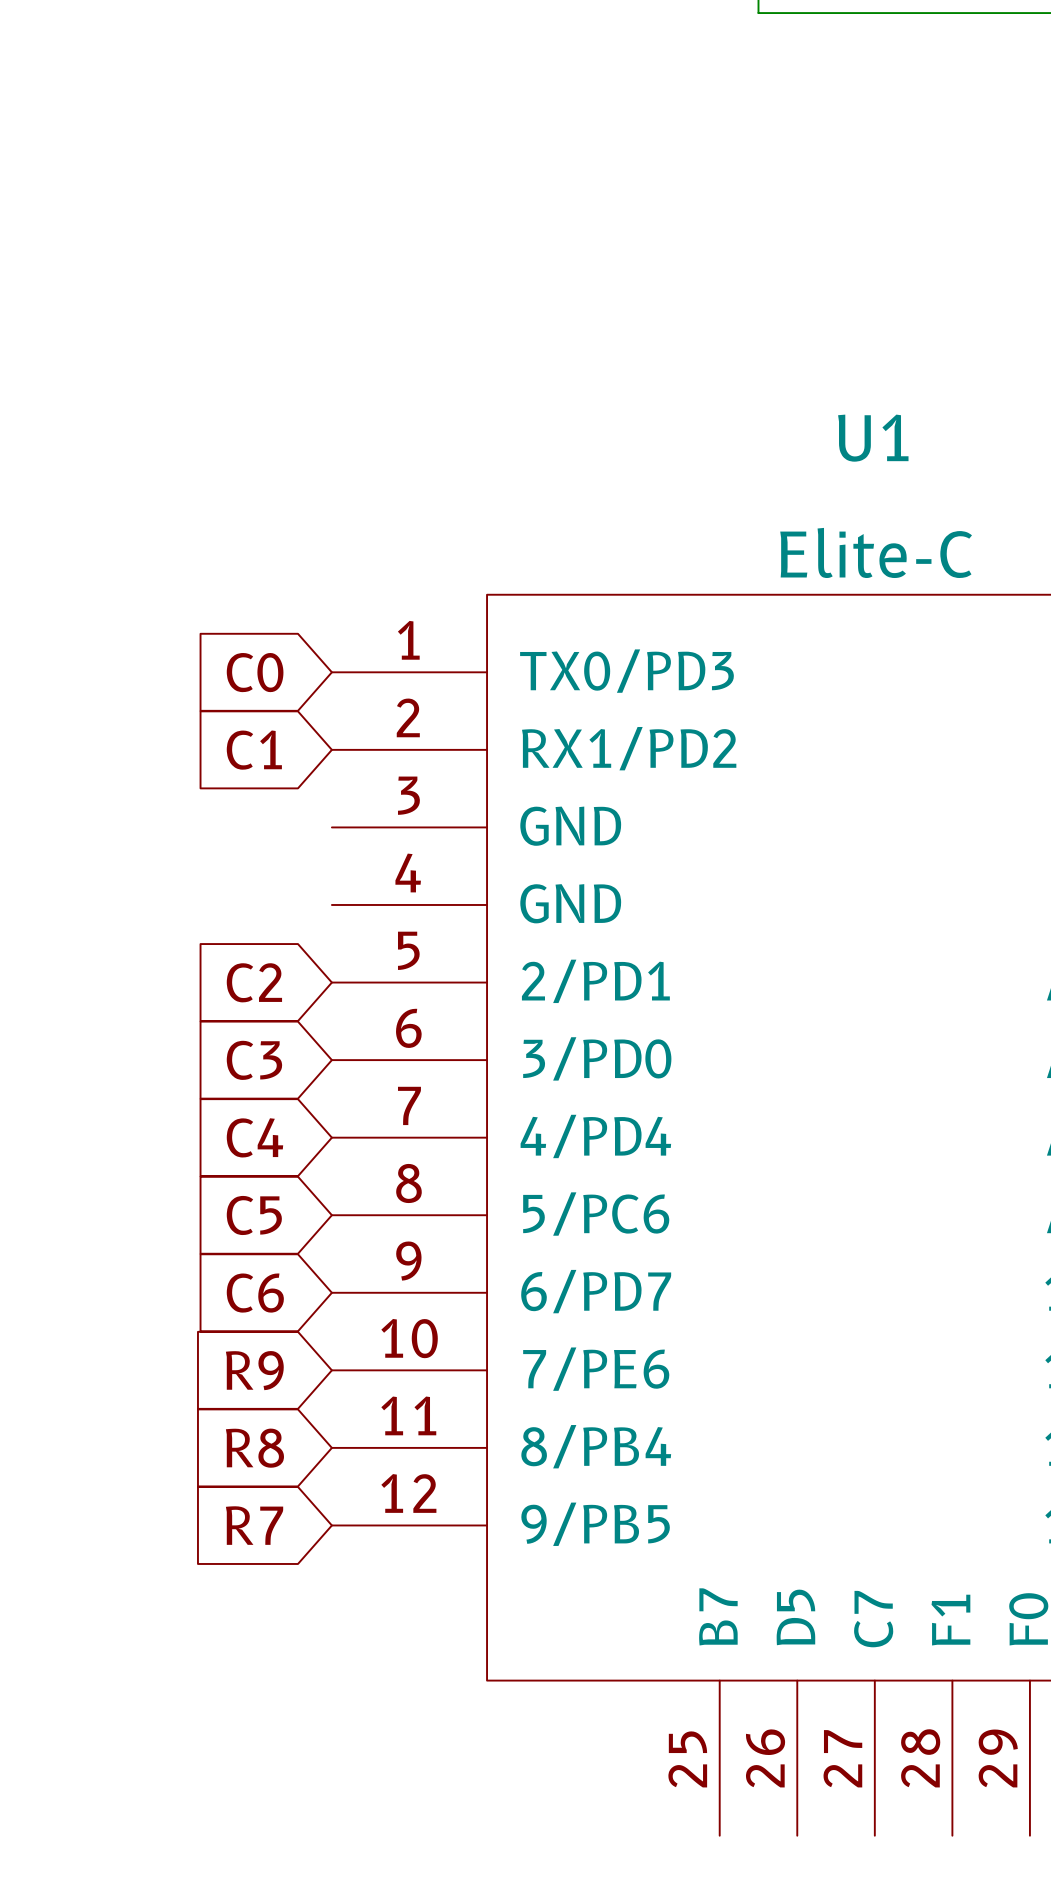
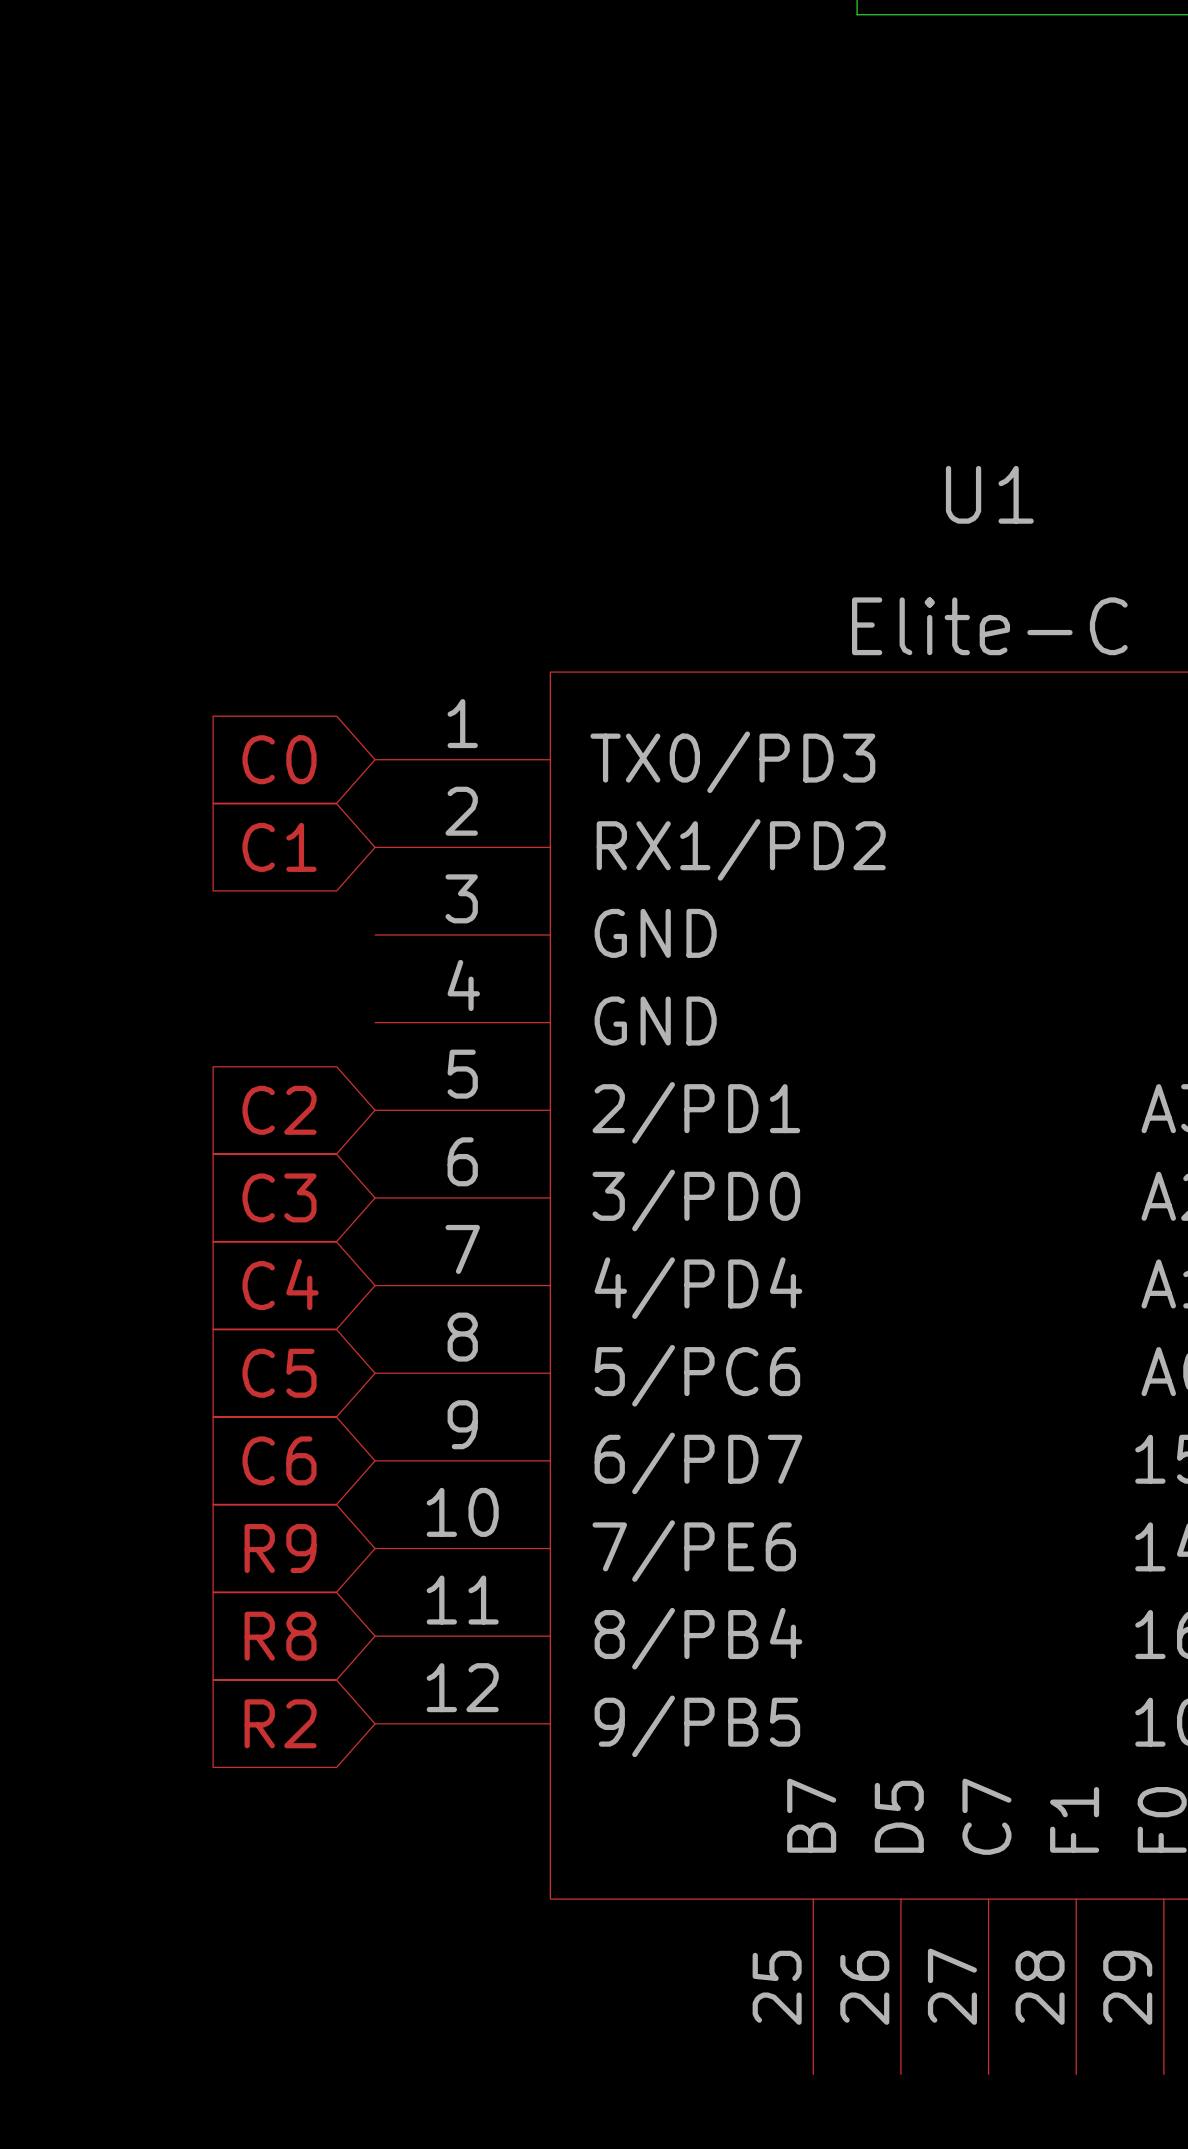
global label: R7 (254, 1525) -> R2 (280, 1723)

